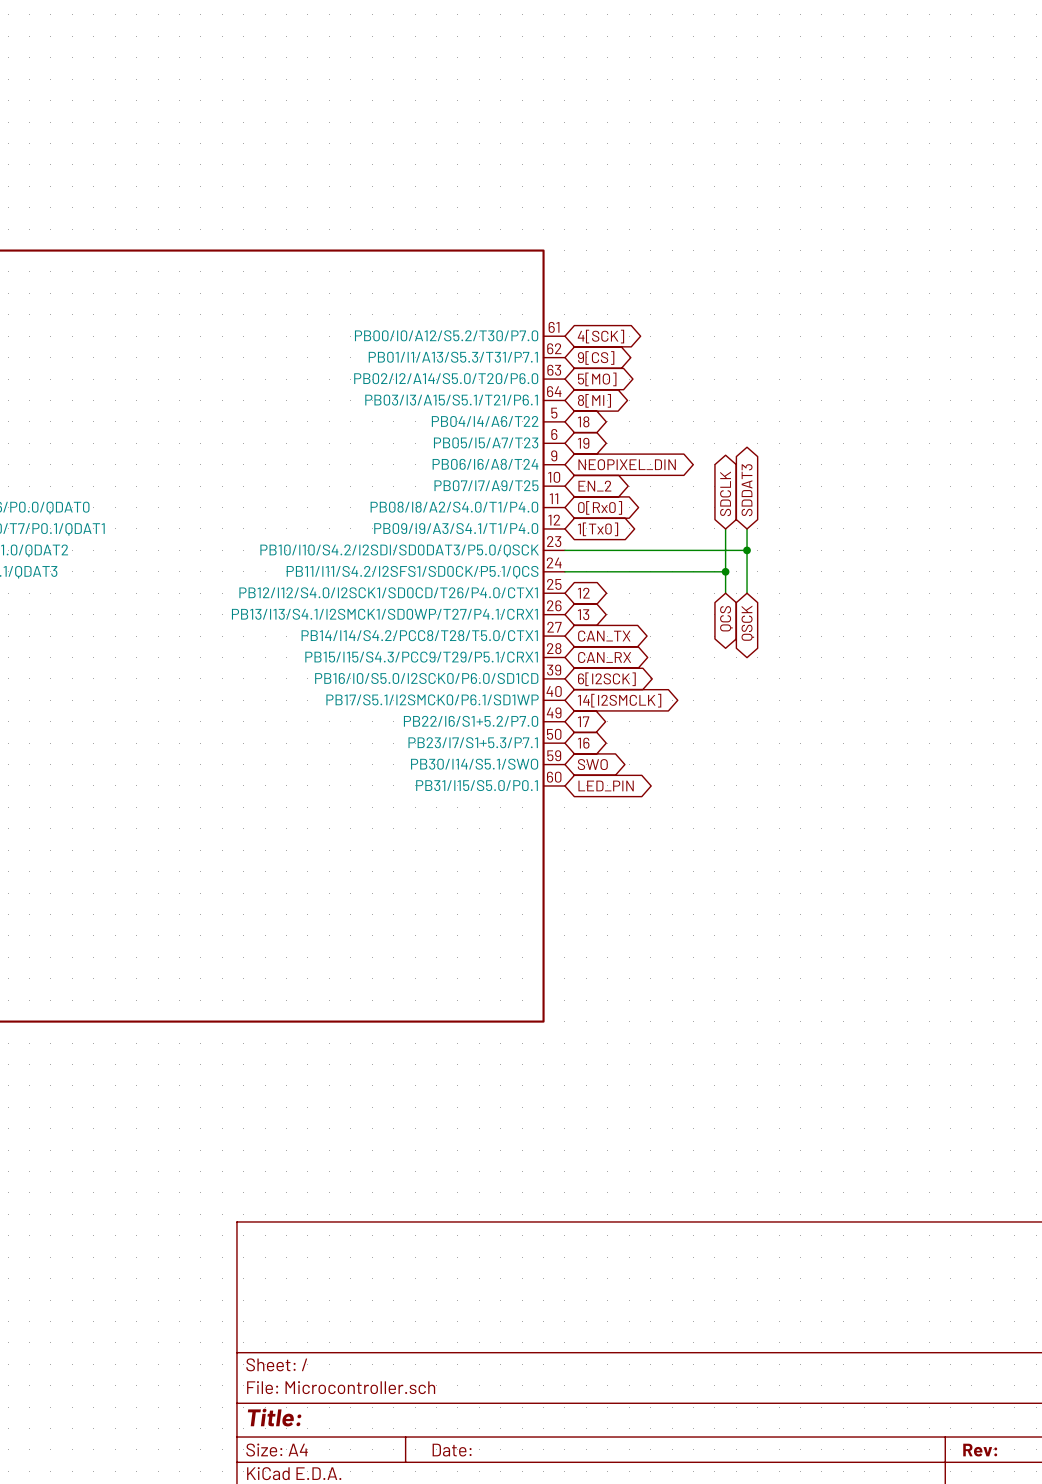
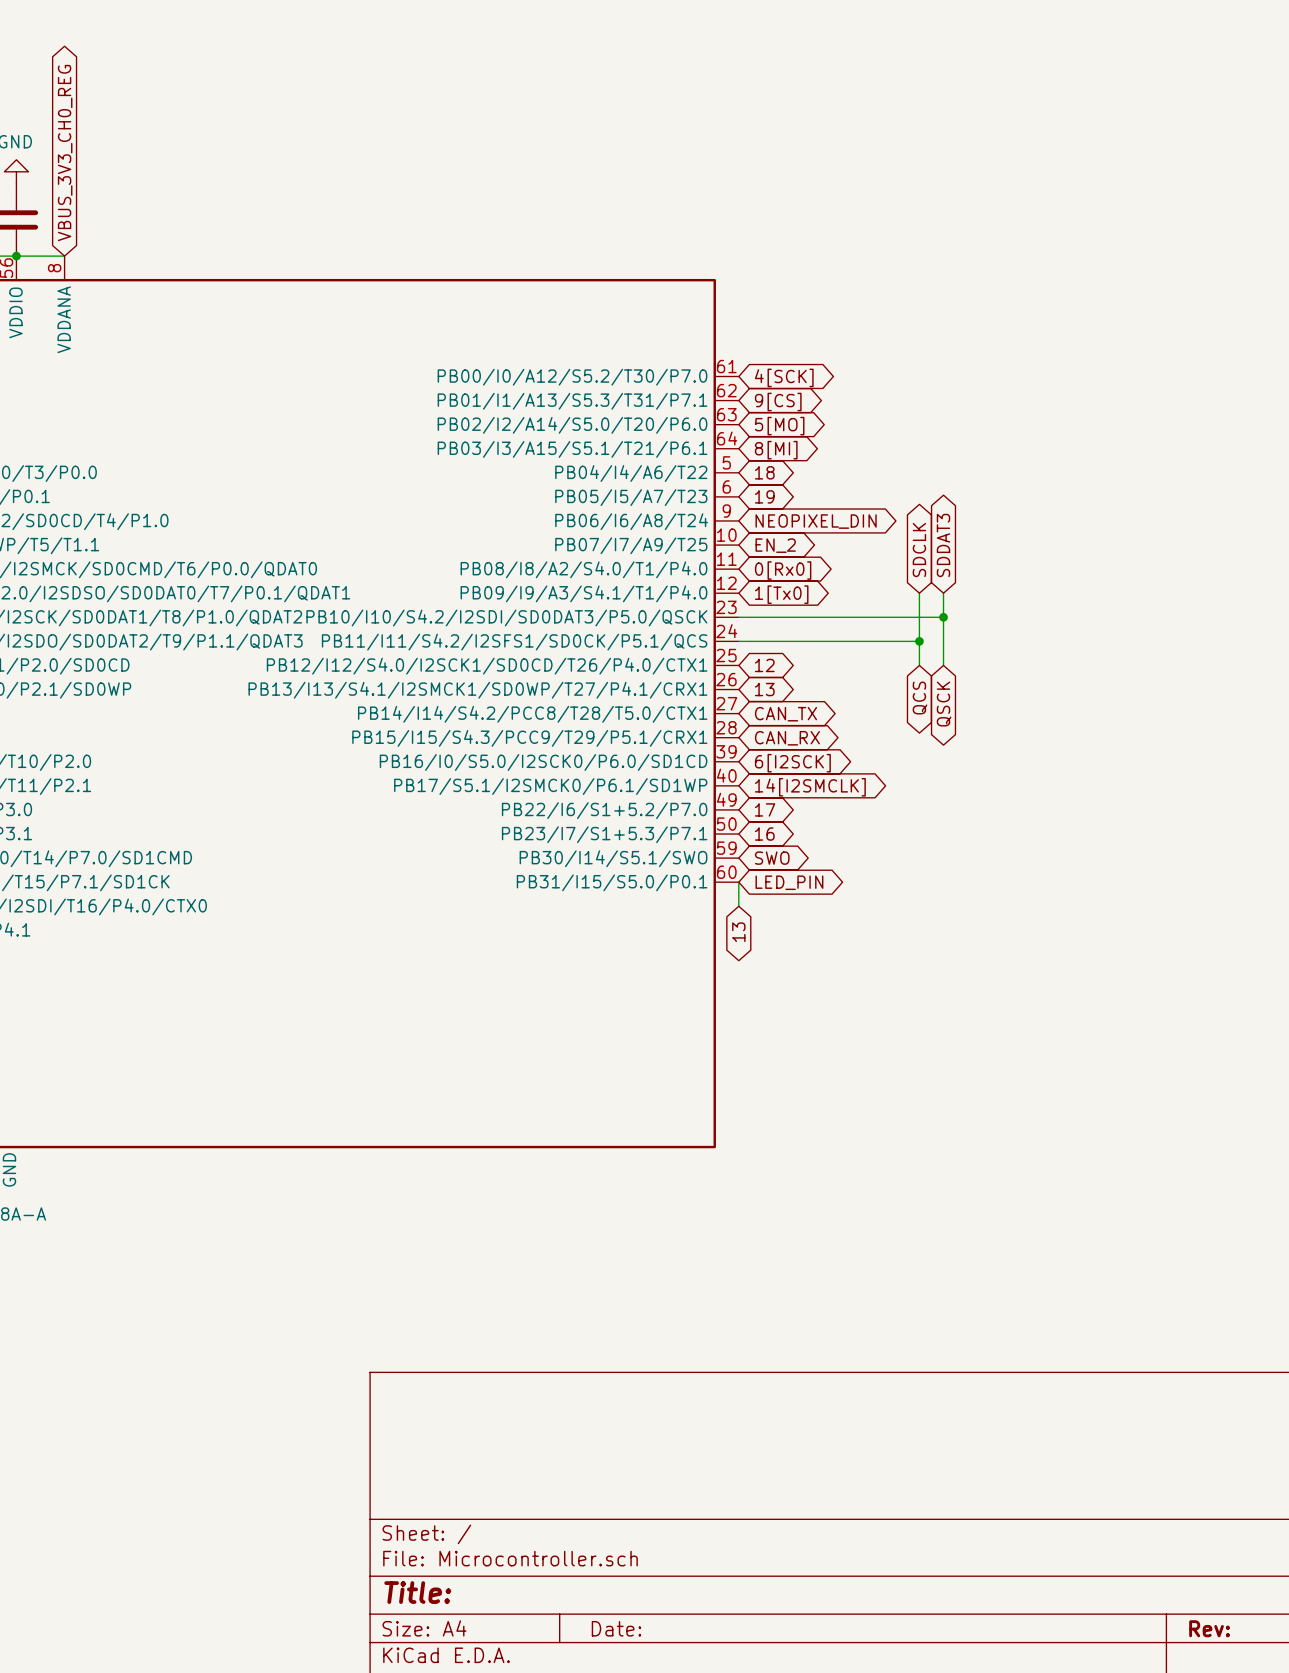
wire: none -> (738, 882) (738, 906)
global label: none -> 13 (738, 932)

